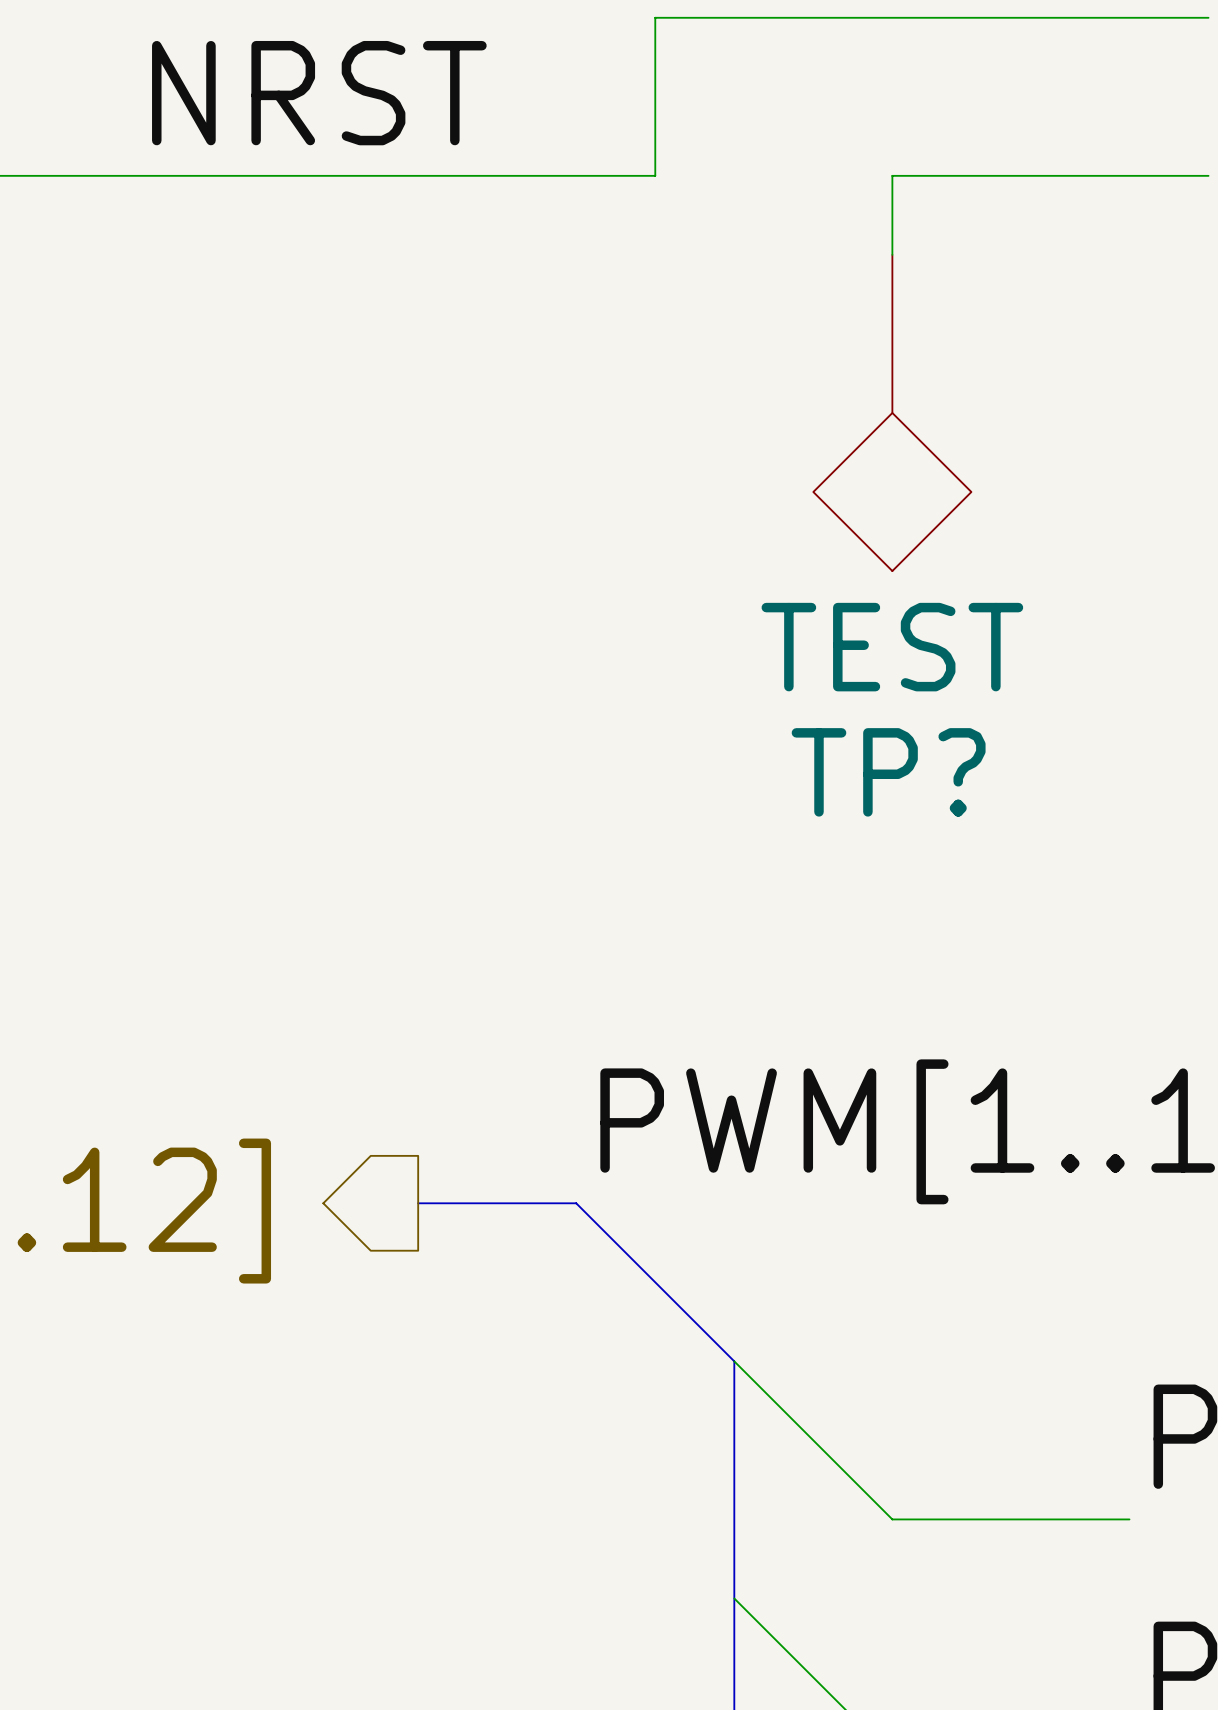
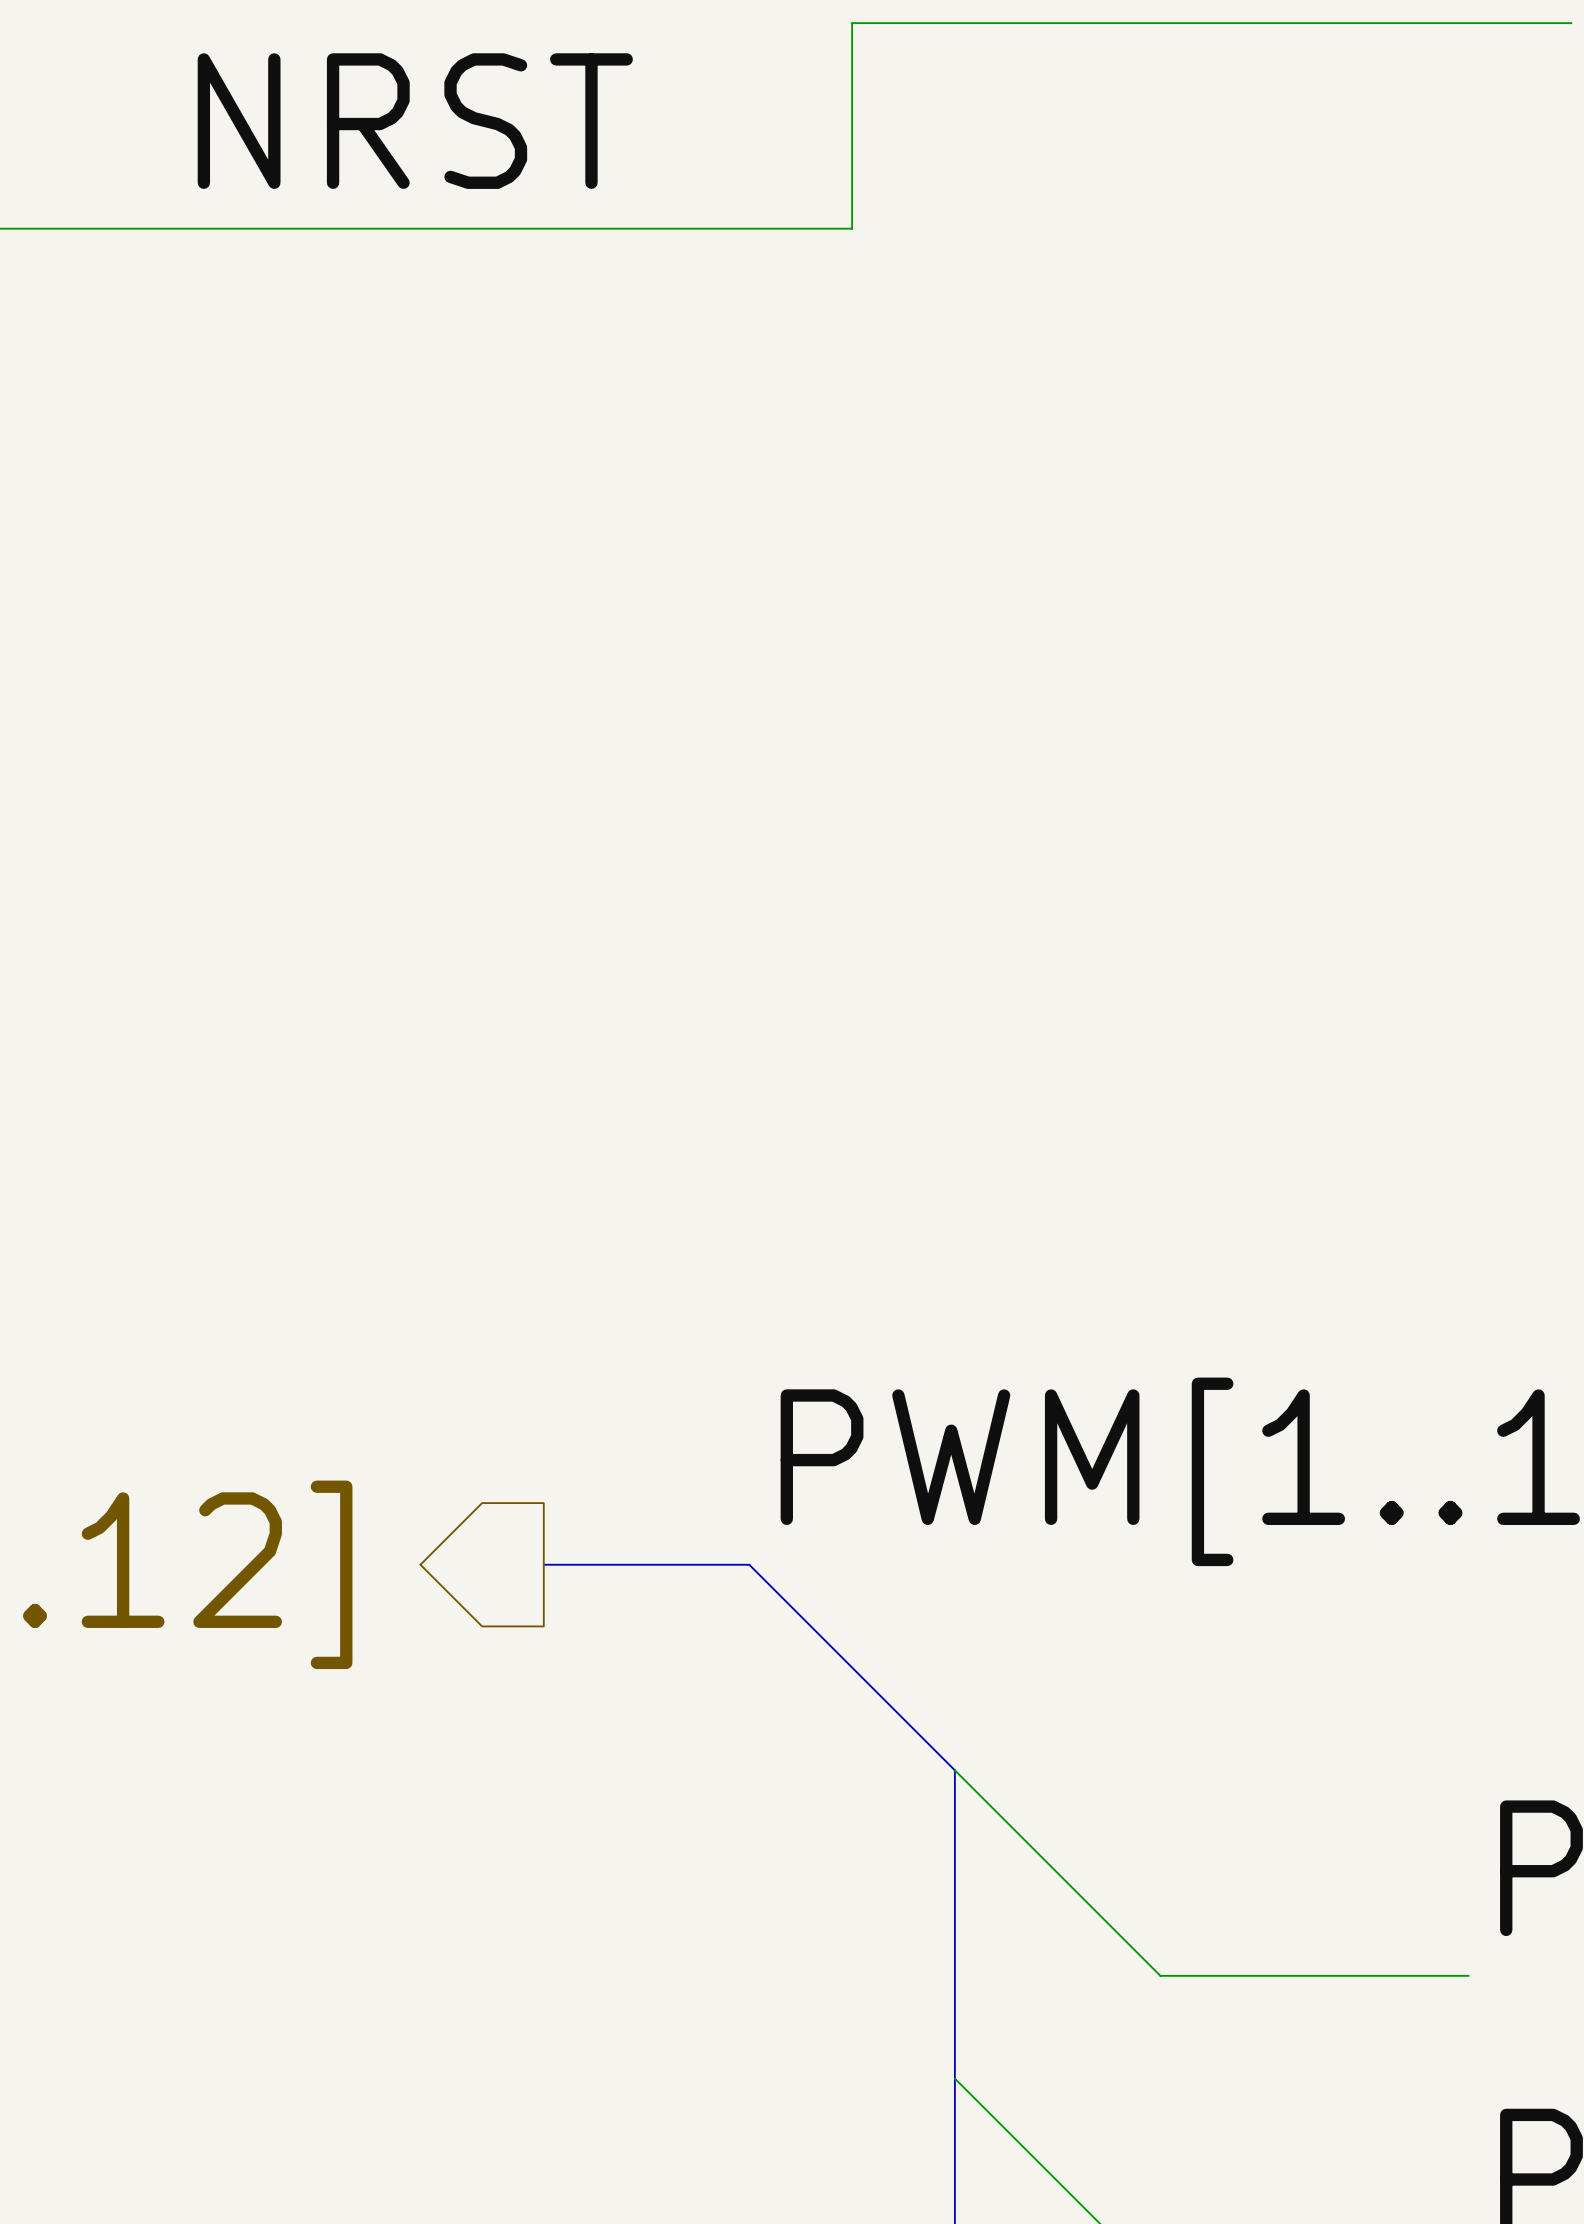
wire: (1208, 175) (892, 175) (892, 254) -> none
TP?: TEST (892, 412) -> none

